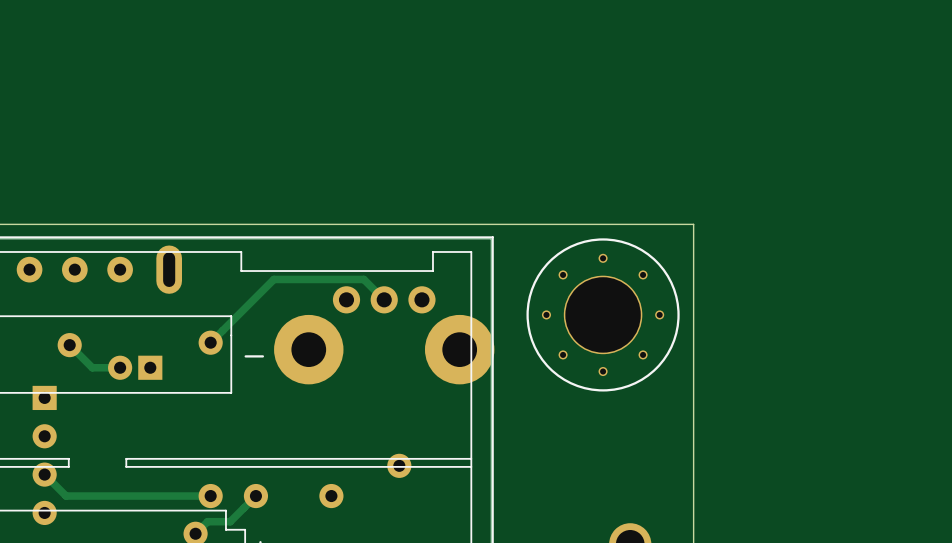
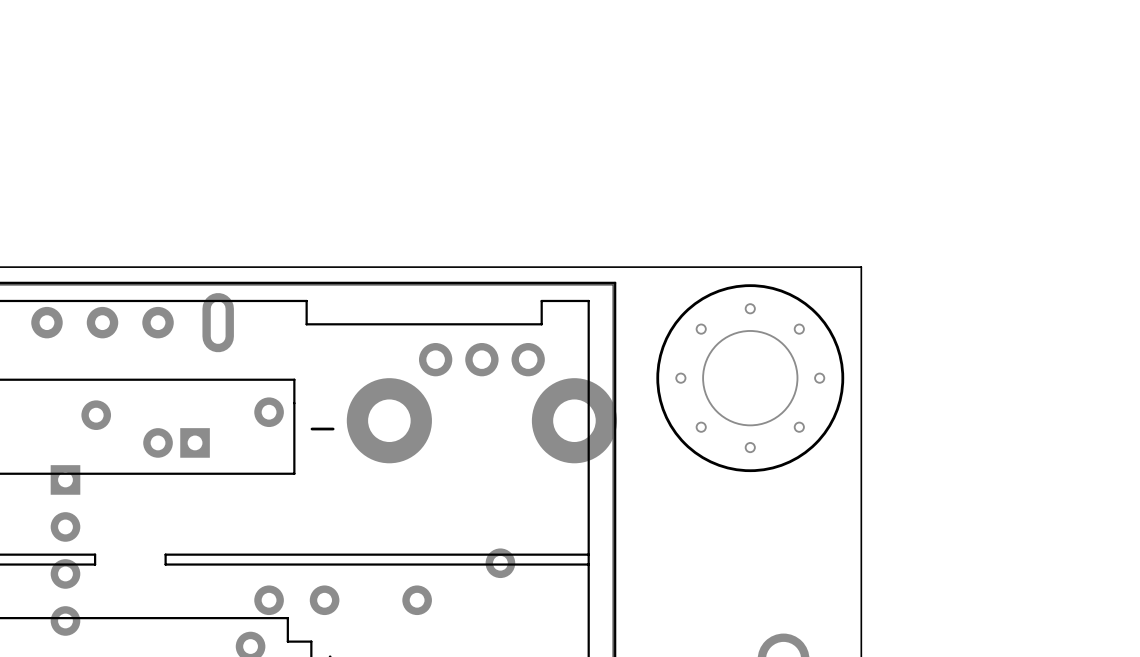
track: (384, 299) (363, 279) (273, 279) (210, 342) -> none
track: (69, 345) (92, 367) (120, 367) -> none
track: (44, 474) (66, 496) (210, 496) -> none
track: (255, 496) (230, 521) (207, 521) (195, 533) -> none

